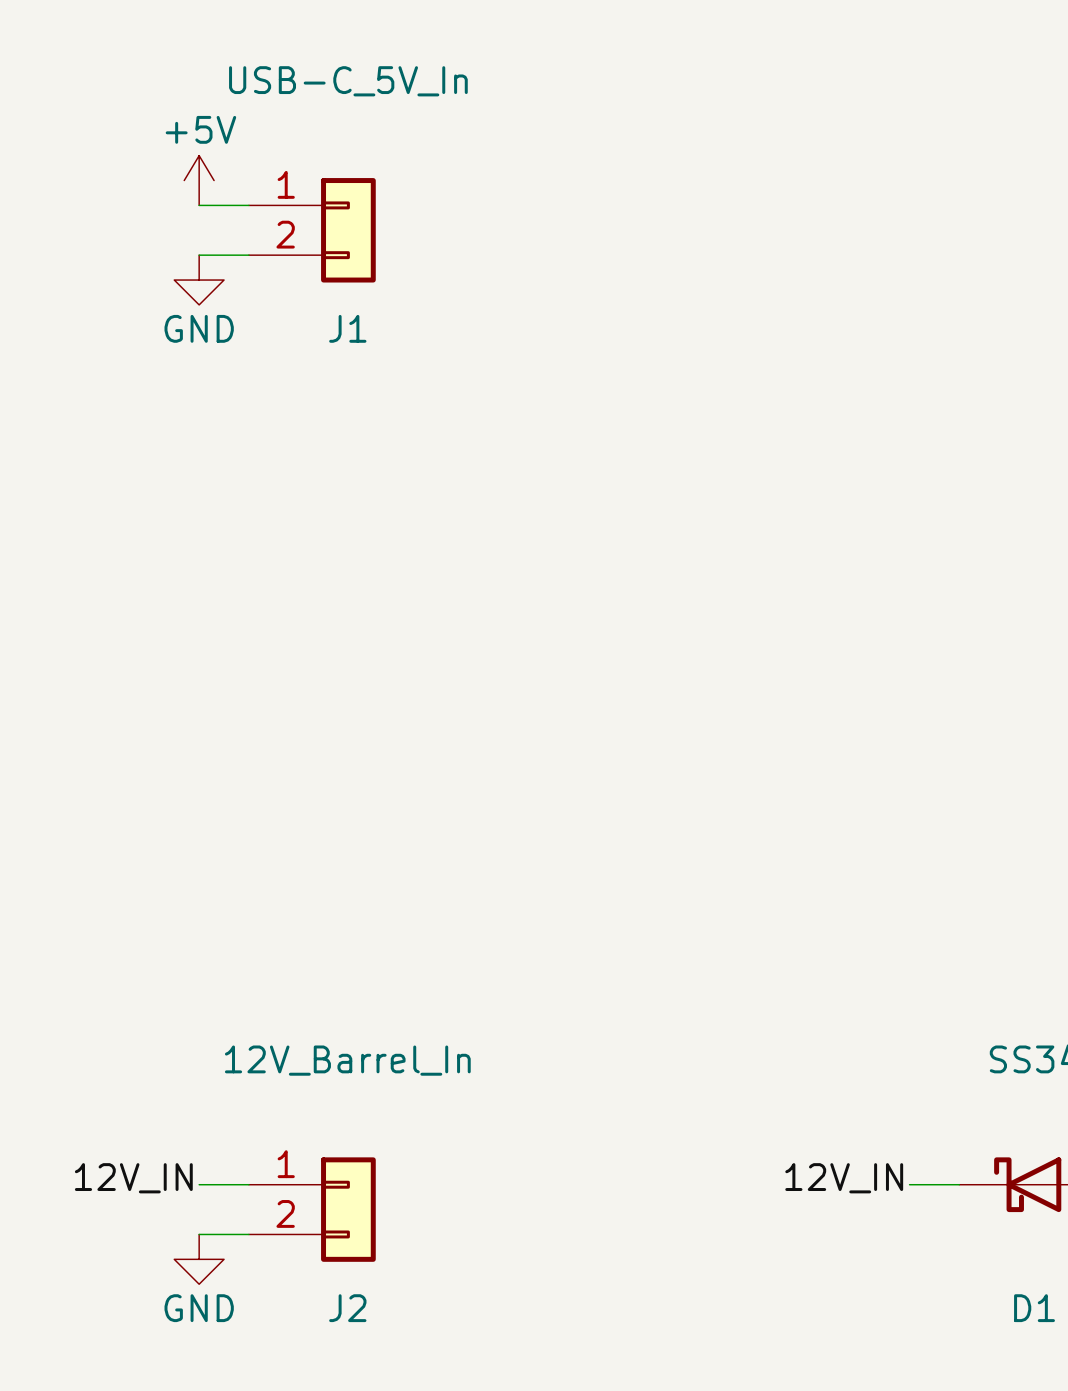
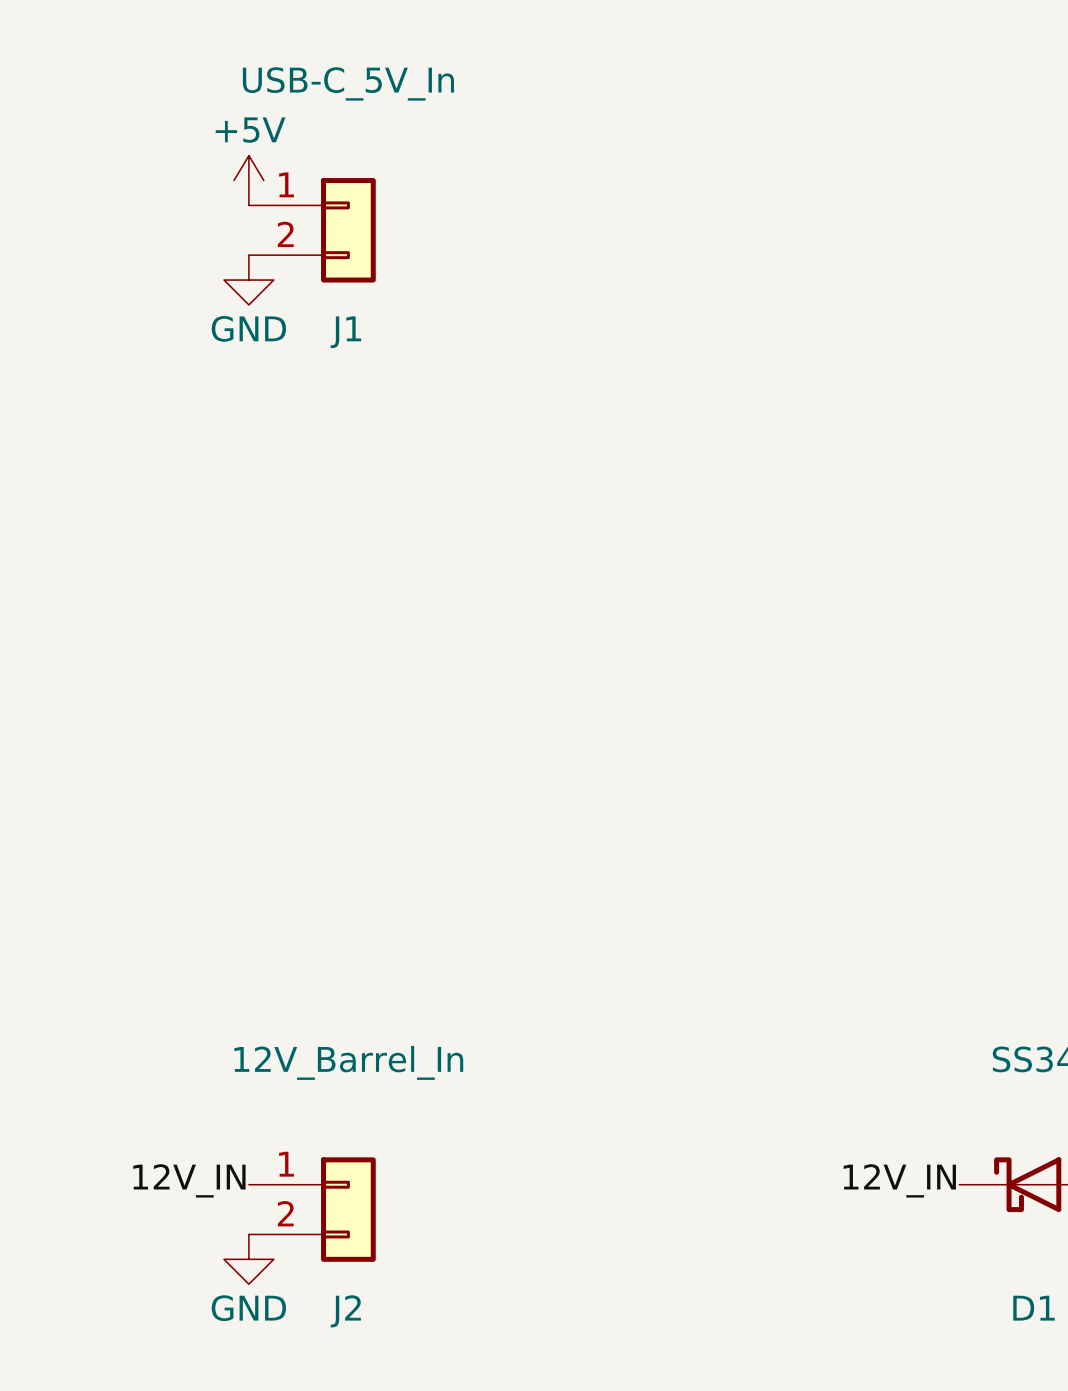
power symbol position: +5V (199, 180) -> +5V (248, 180)
wire: (199, 205) (248, 205) -> none
wire: (199, 255) (248, 255) -> none
power symbol position: GND (199, 280) -> GND (248, 280)
label position: 12V_IN (133, 1178) -> 12V_IN (189, 1180)
label position: 12V_IN (844, 1178) -> 12V_IN (899, 1180)
wire: (199, 1184) (248, 1184) -> none
wire: (909, 1184) (959, 1184) -> none
wire: (199, 1234) (248, 1234) -> none
power symbol position: GND (199, 1259) -> GND (248, 1259)

